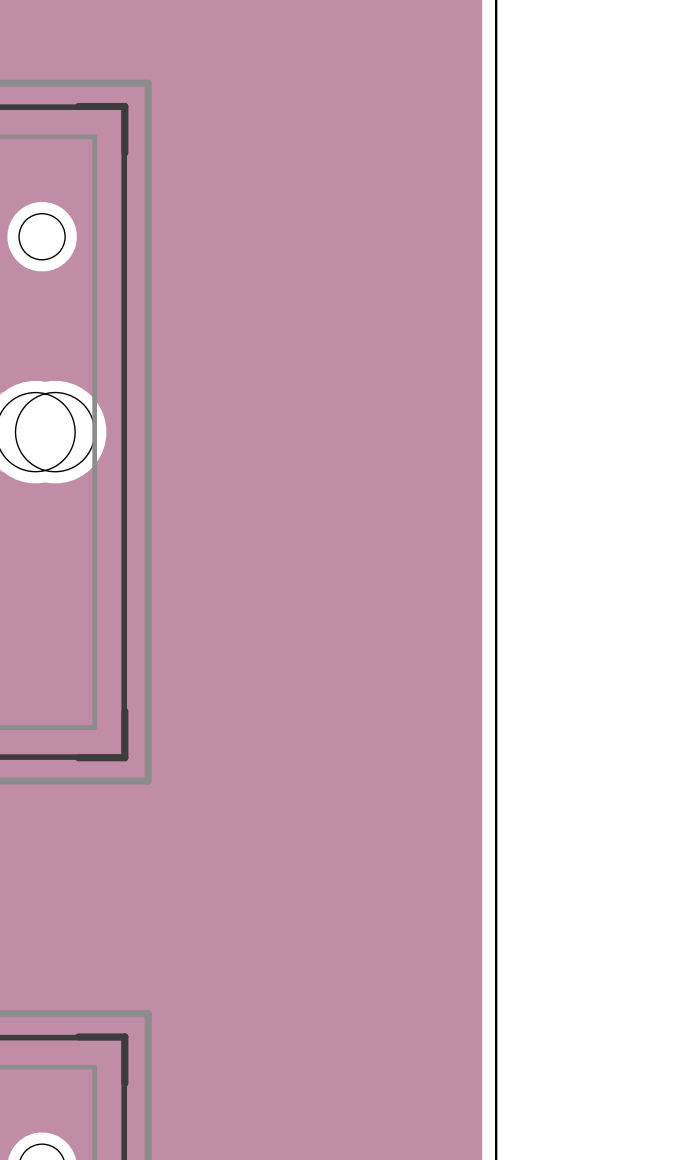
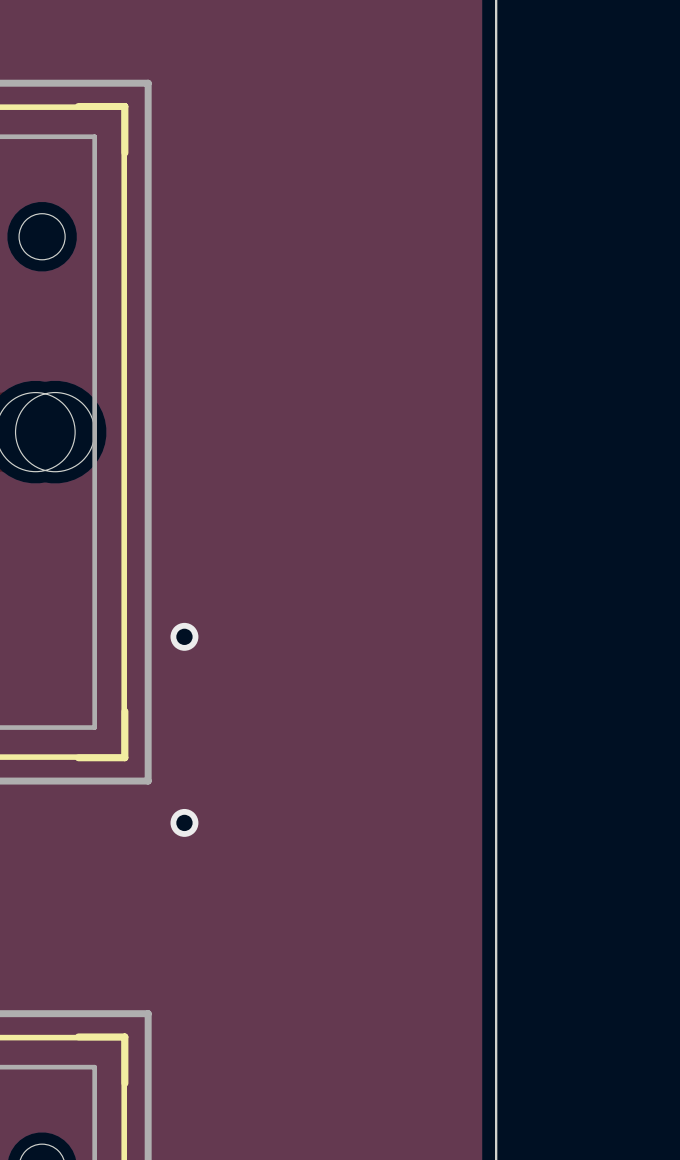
via: none -> (184, 636)
via: none -> (184, 822)

